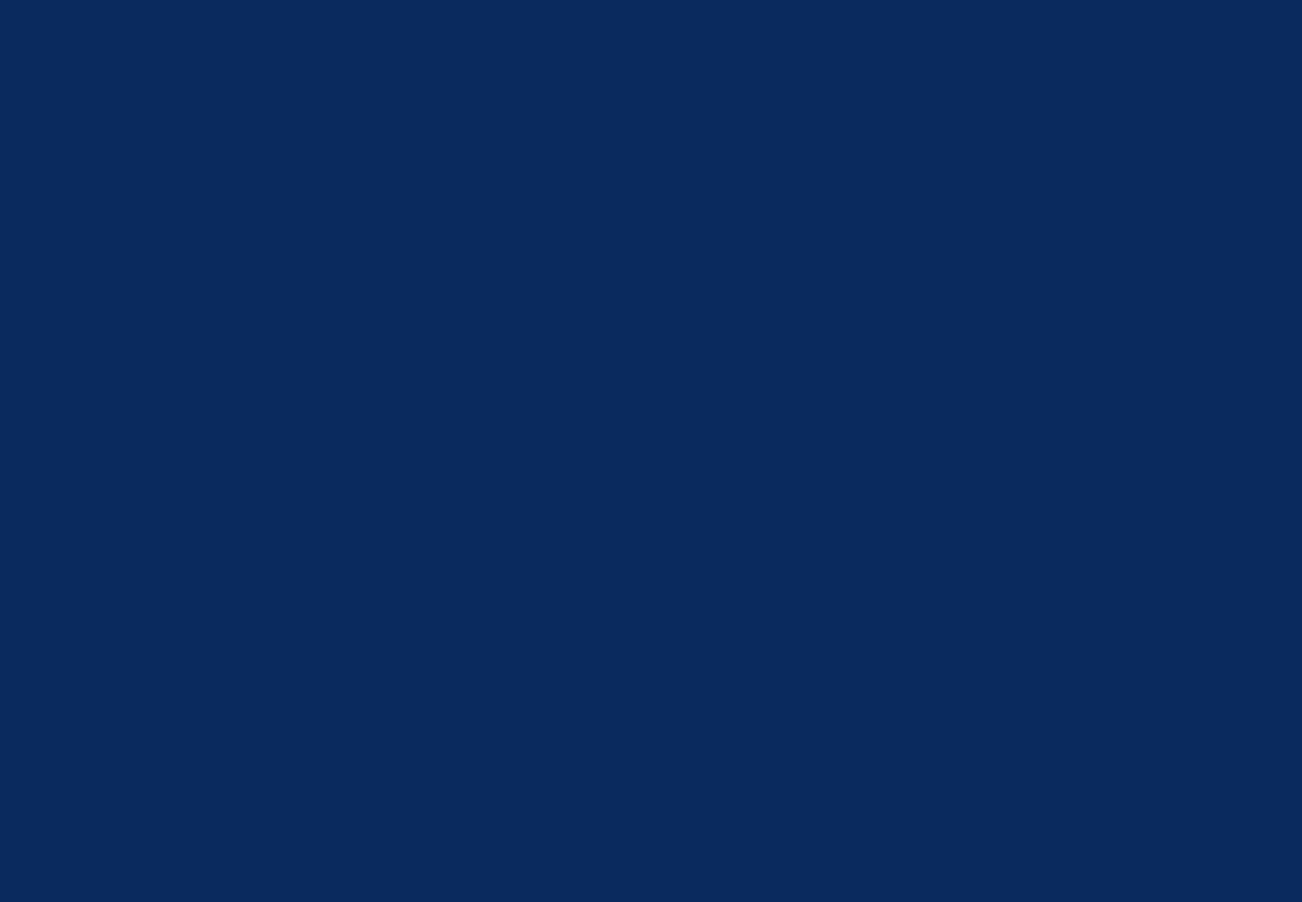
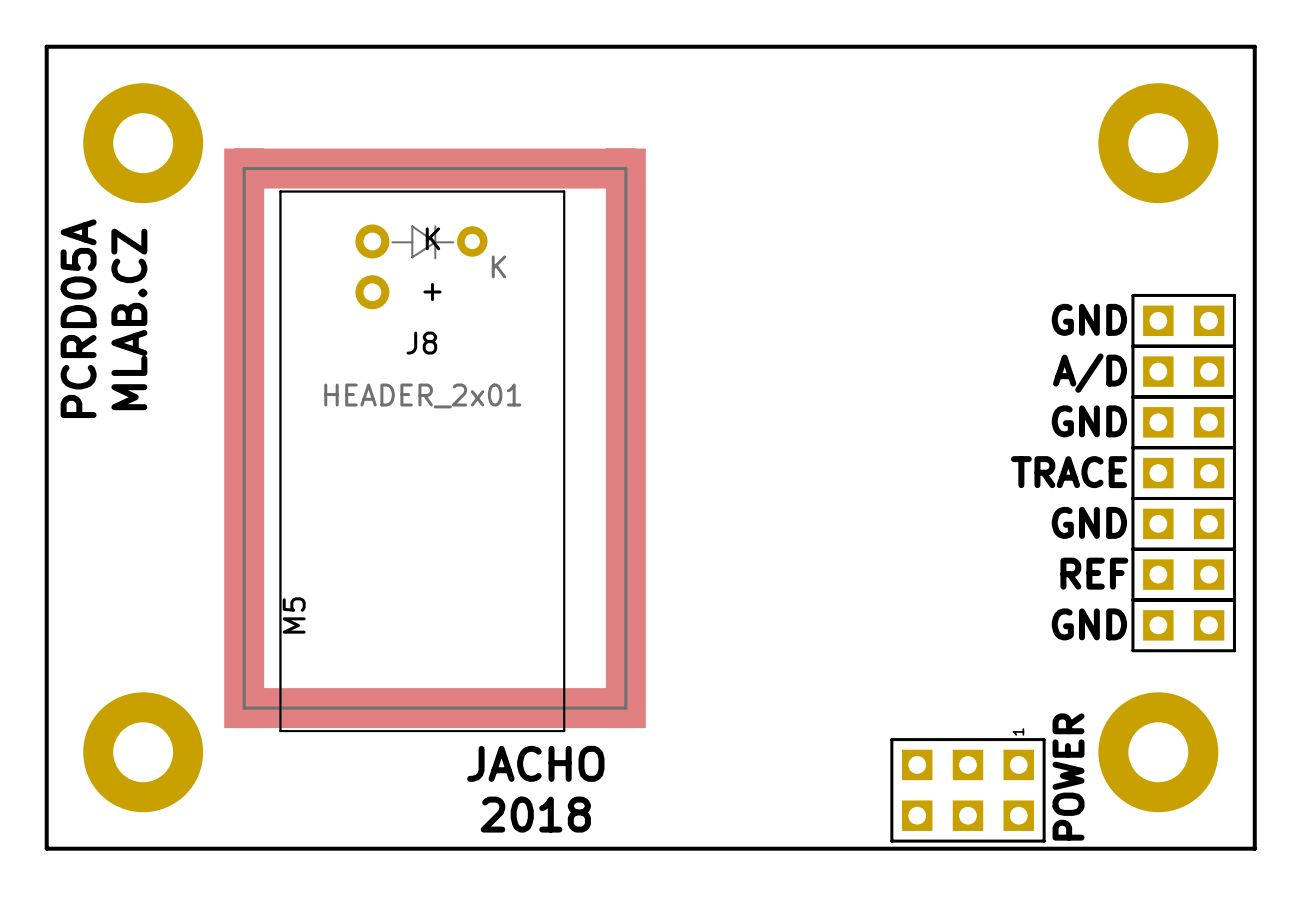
board edge: none -> (46, 46) (46, 848) (1254, 848) (1254, 46) (46, 46)
part: none -> (143, 143)
part: none -> (1158, 143)
text: none -> K (432, 238)
text: none -> + (432, 292)
text: none -> PCRD05A (78, 318)
text: none -> MLAB.CZ (129, 319)
text: none -> GND (1089, 319)
part: none -> (1183, 320)
part: none -> (1183, 371)
text: none -> A/D (1090, 373)
text: none -> GND (1089, 421)
part: none -> (1183, 422)
M5: none -> (435, 438)
J8: none -> HEADER_2x01 (422, 461)
text: none -> TRACE (1069, 472)
part: none -> (1183, 473)
text: none -> GND (1089, 522)
part: none -> (1183, 523)
text: none -> REF (1094, 573)
part: none -> (1183, 574)
text: none -> GND (1089, 624)
part: none -> (1183, 625)
part: none -> (143, 752)
part: none -> (1158, 752)
text: none -> JACHO (535, 763)
text: none -> POWER (1068, 777)
part: none -> (967, 790)
text: none -> 2018 (535, 814)

